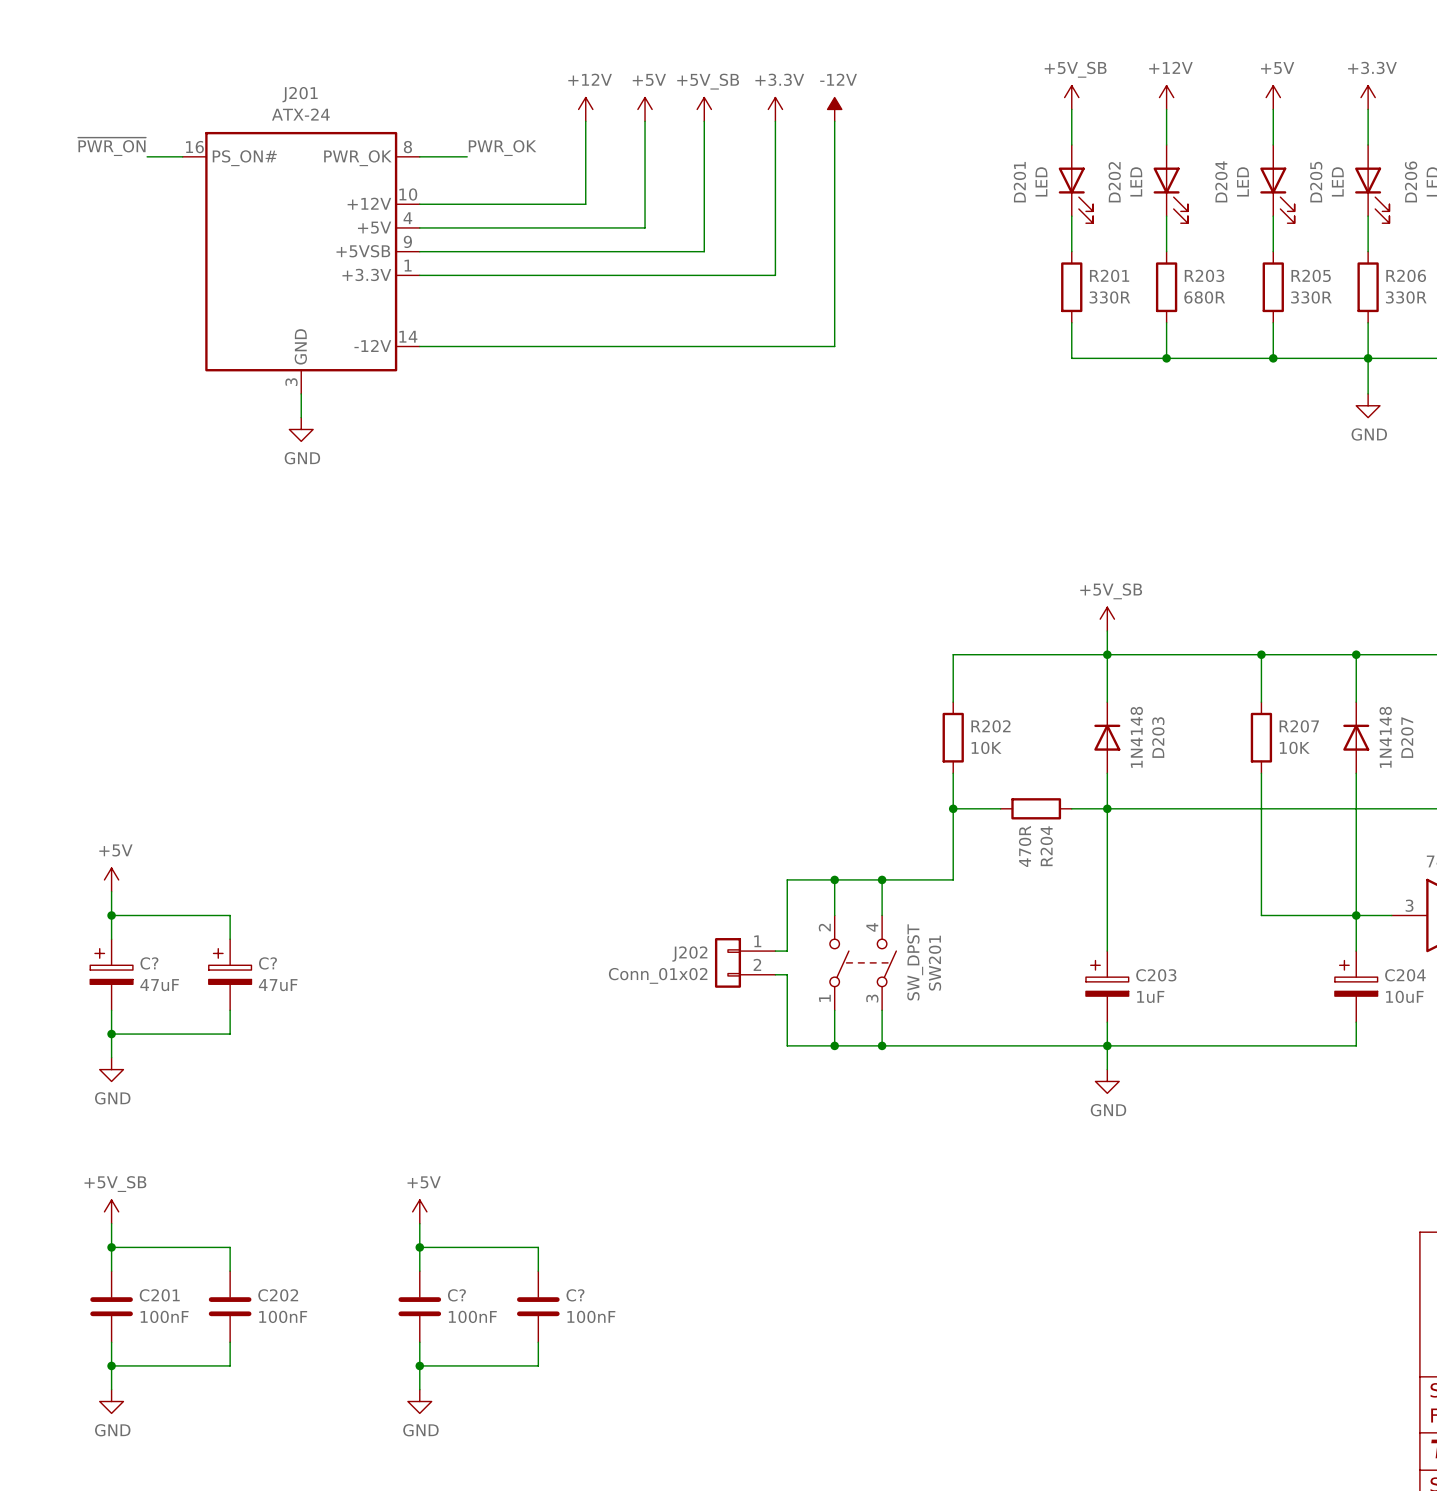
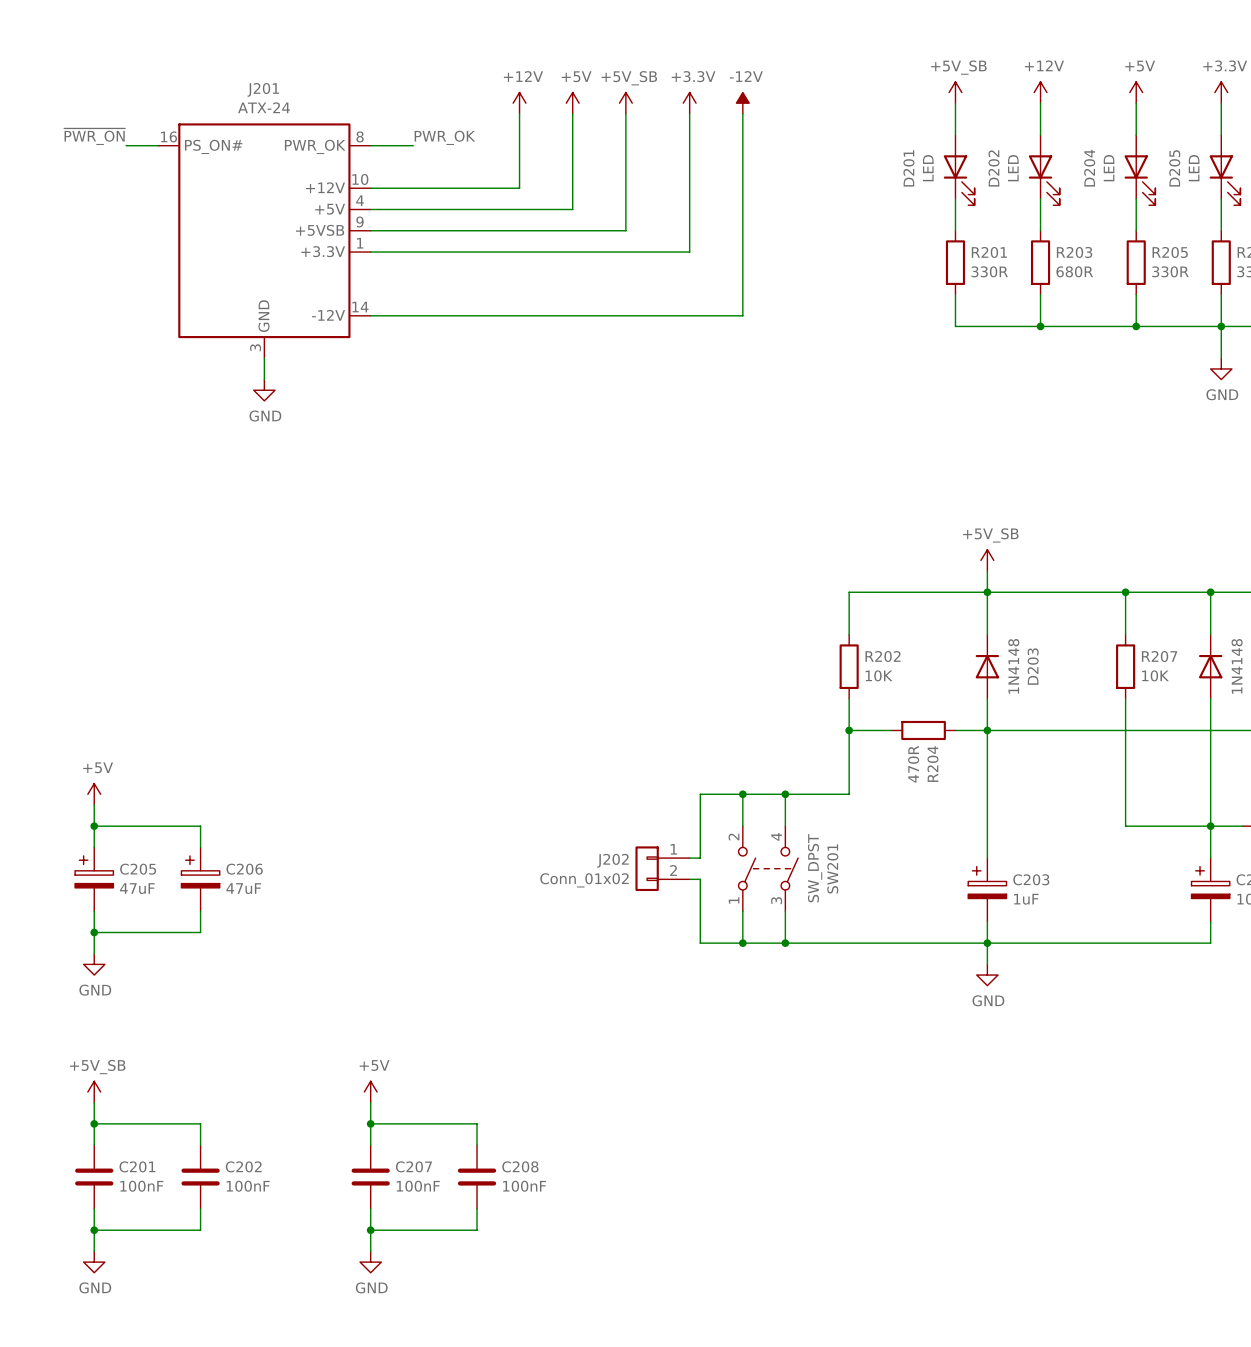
C? name: C? (149, 963) -> C205 (138, 869)
C? name: C? (267, 963) -> C206 (244, 869)
C? name: C? (456, 1295) -> C207 (413, 1166)
C? name: C? (575, 1295) -> C208 (520, 1166)

